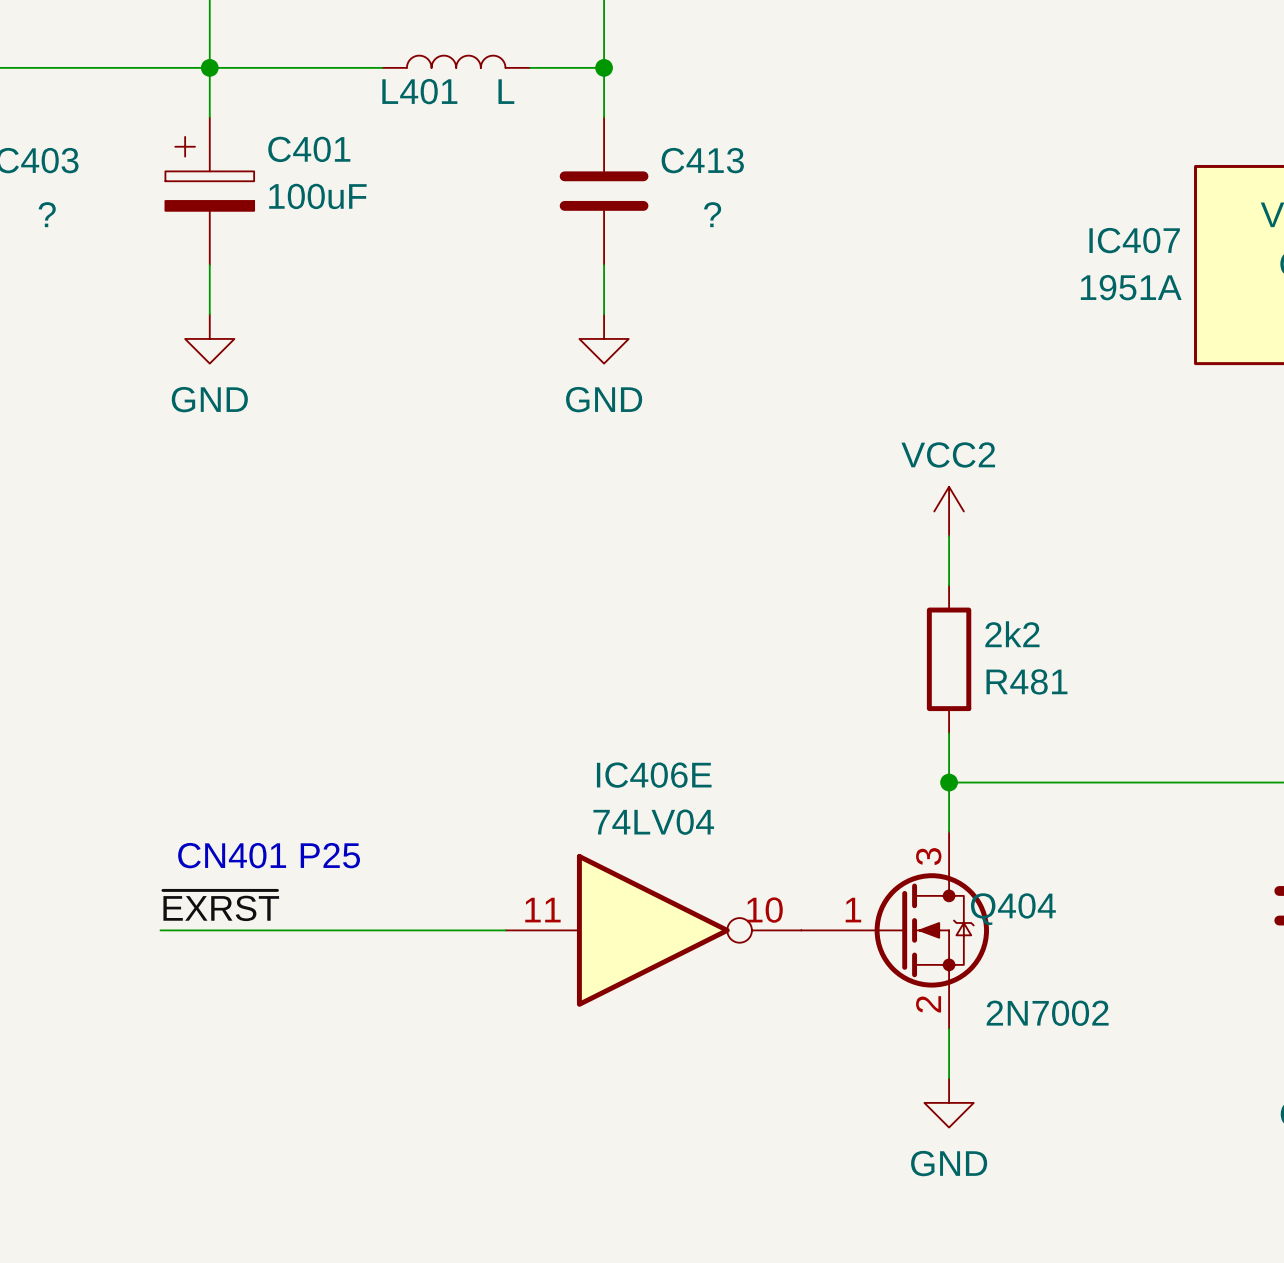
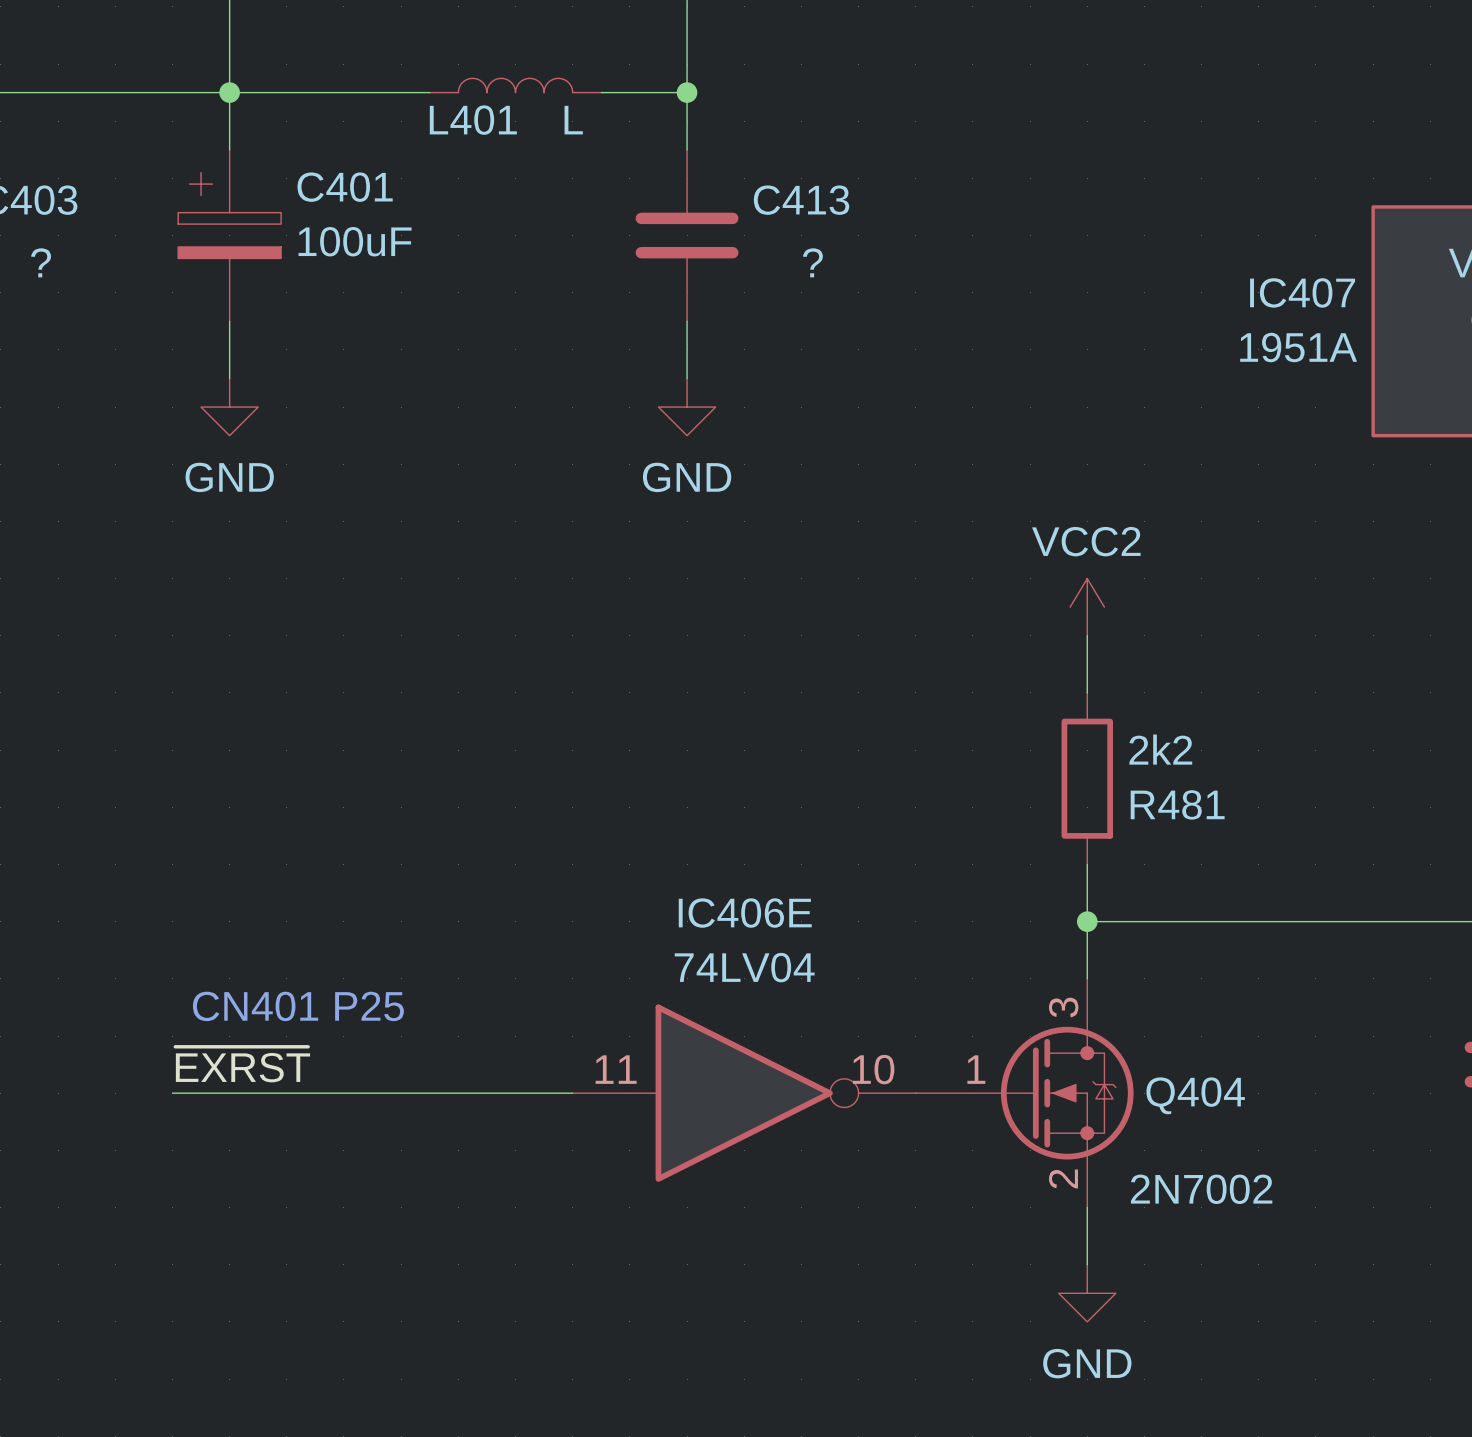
Q404 name position: Q404 (1013, 909) -> Q404 (1195, 1095)

